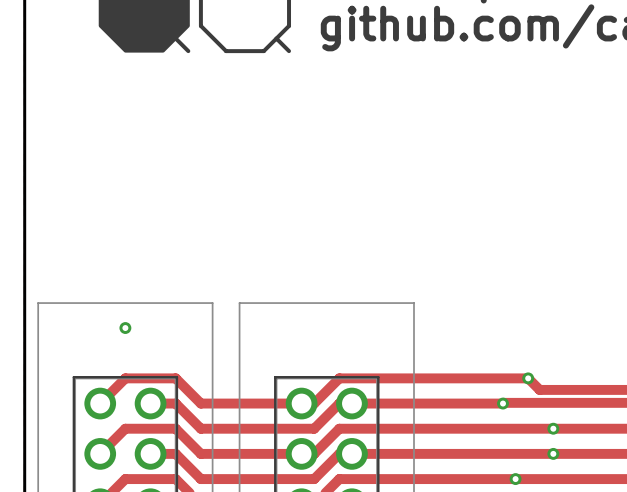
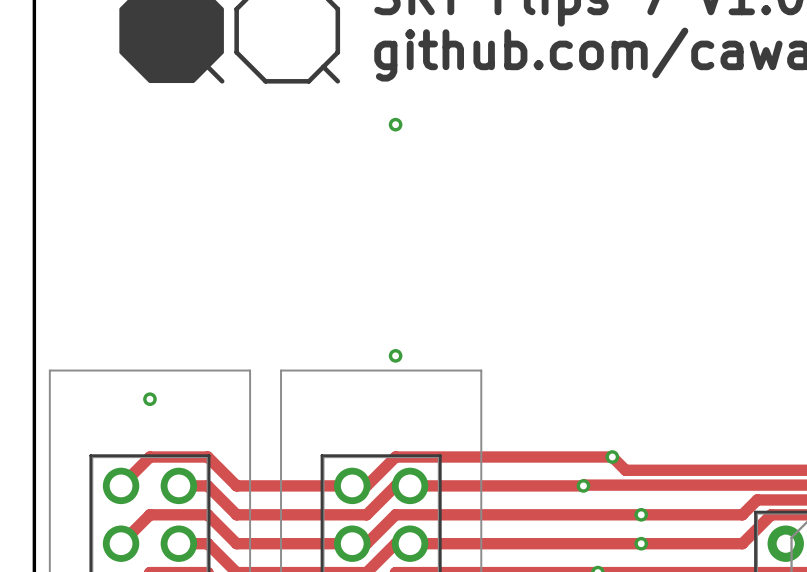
via: none -> (395, 124)
via: none -> (395, 355)

